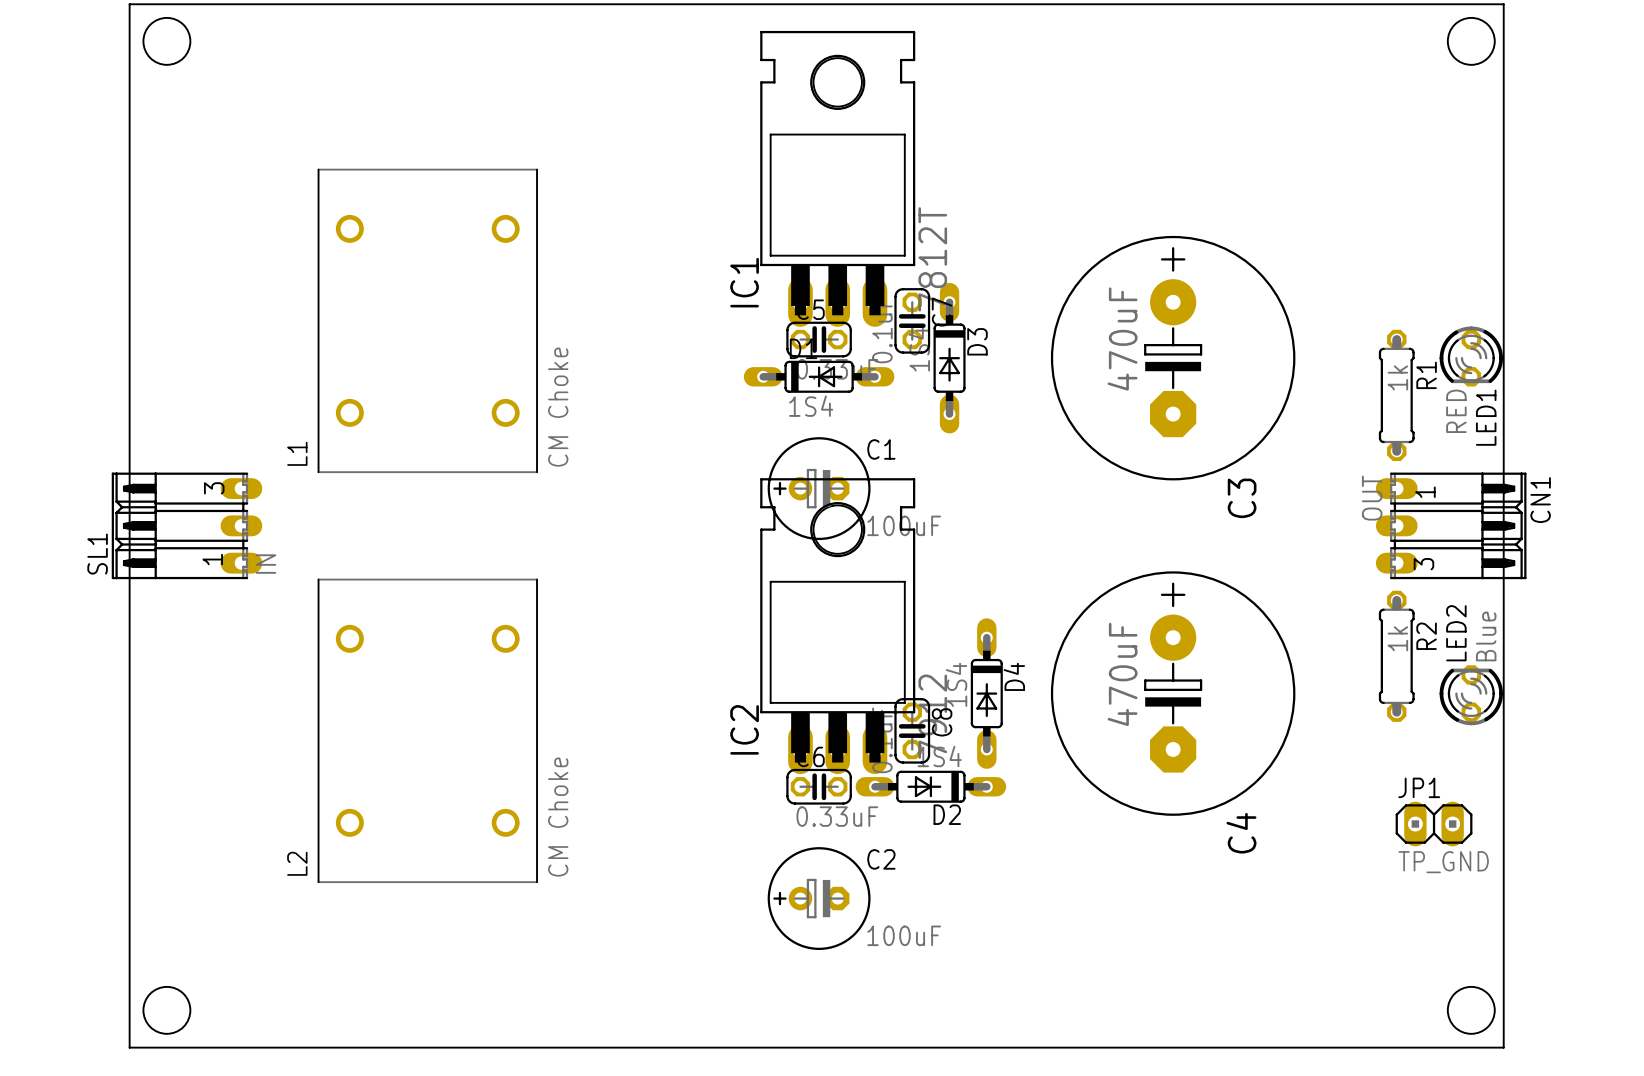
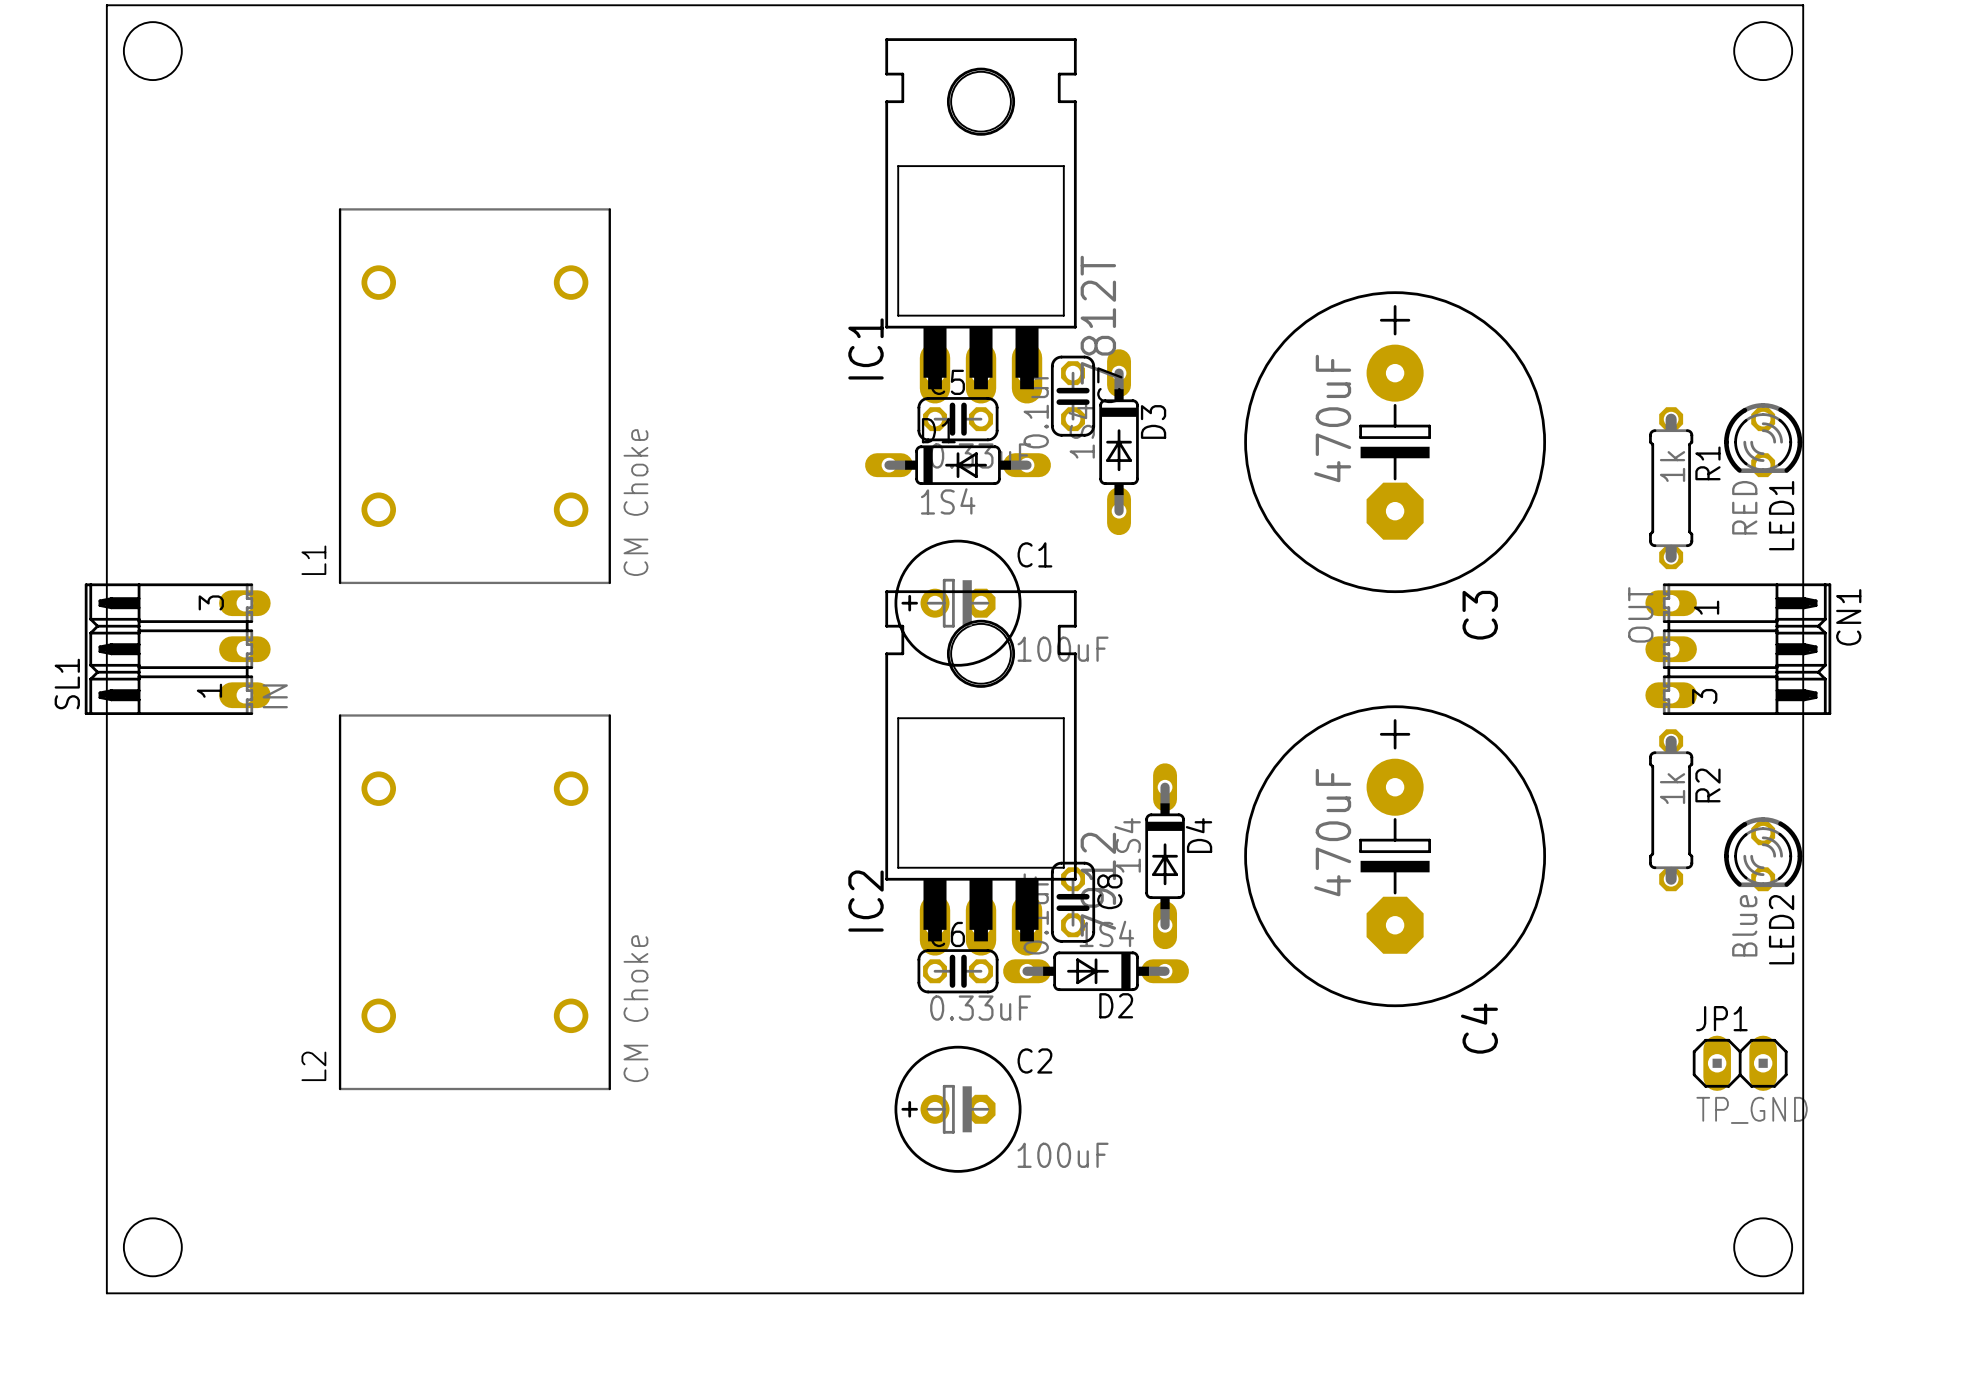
LED2 rotation: 0° (1471, 695) -> 180° (1763, 854)
JP1 position: (1434, 824) -> (1740, 1063)

